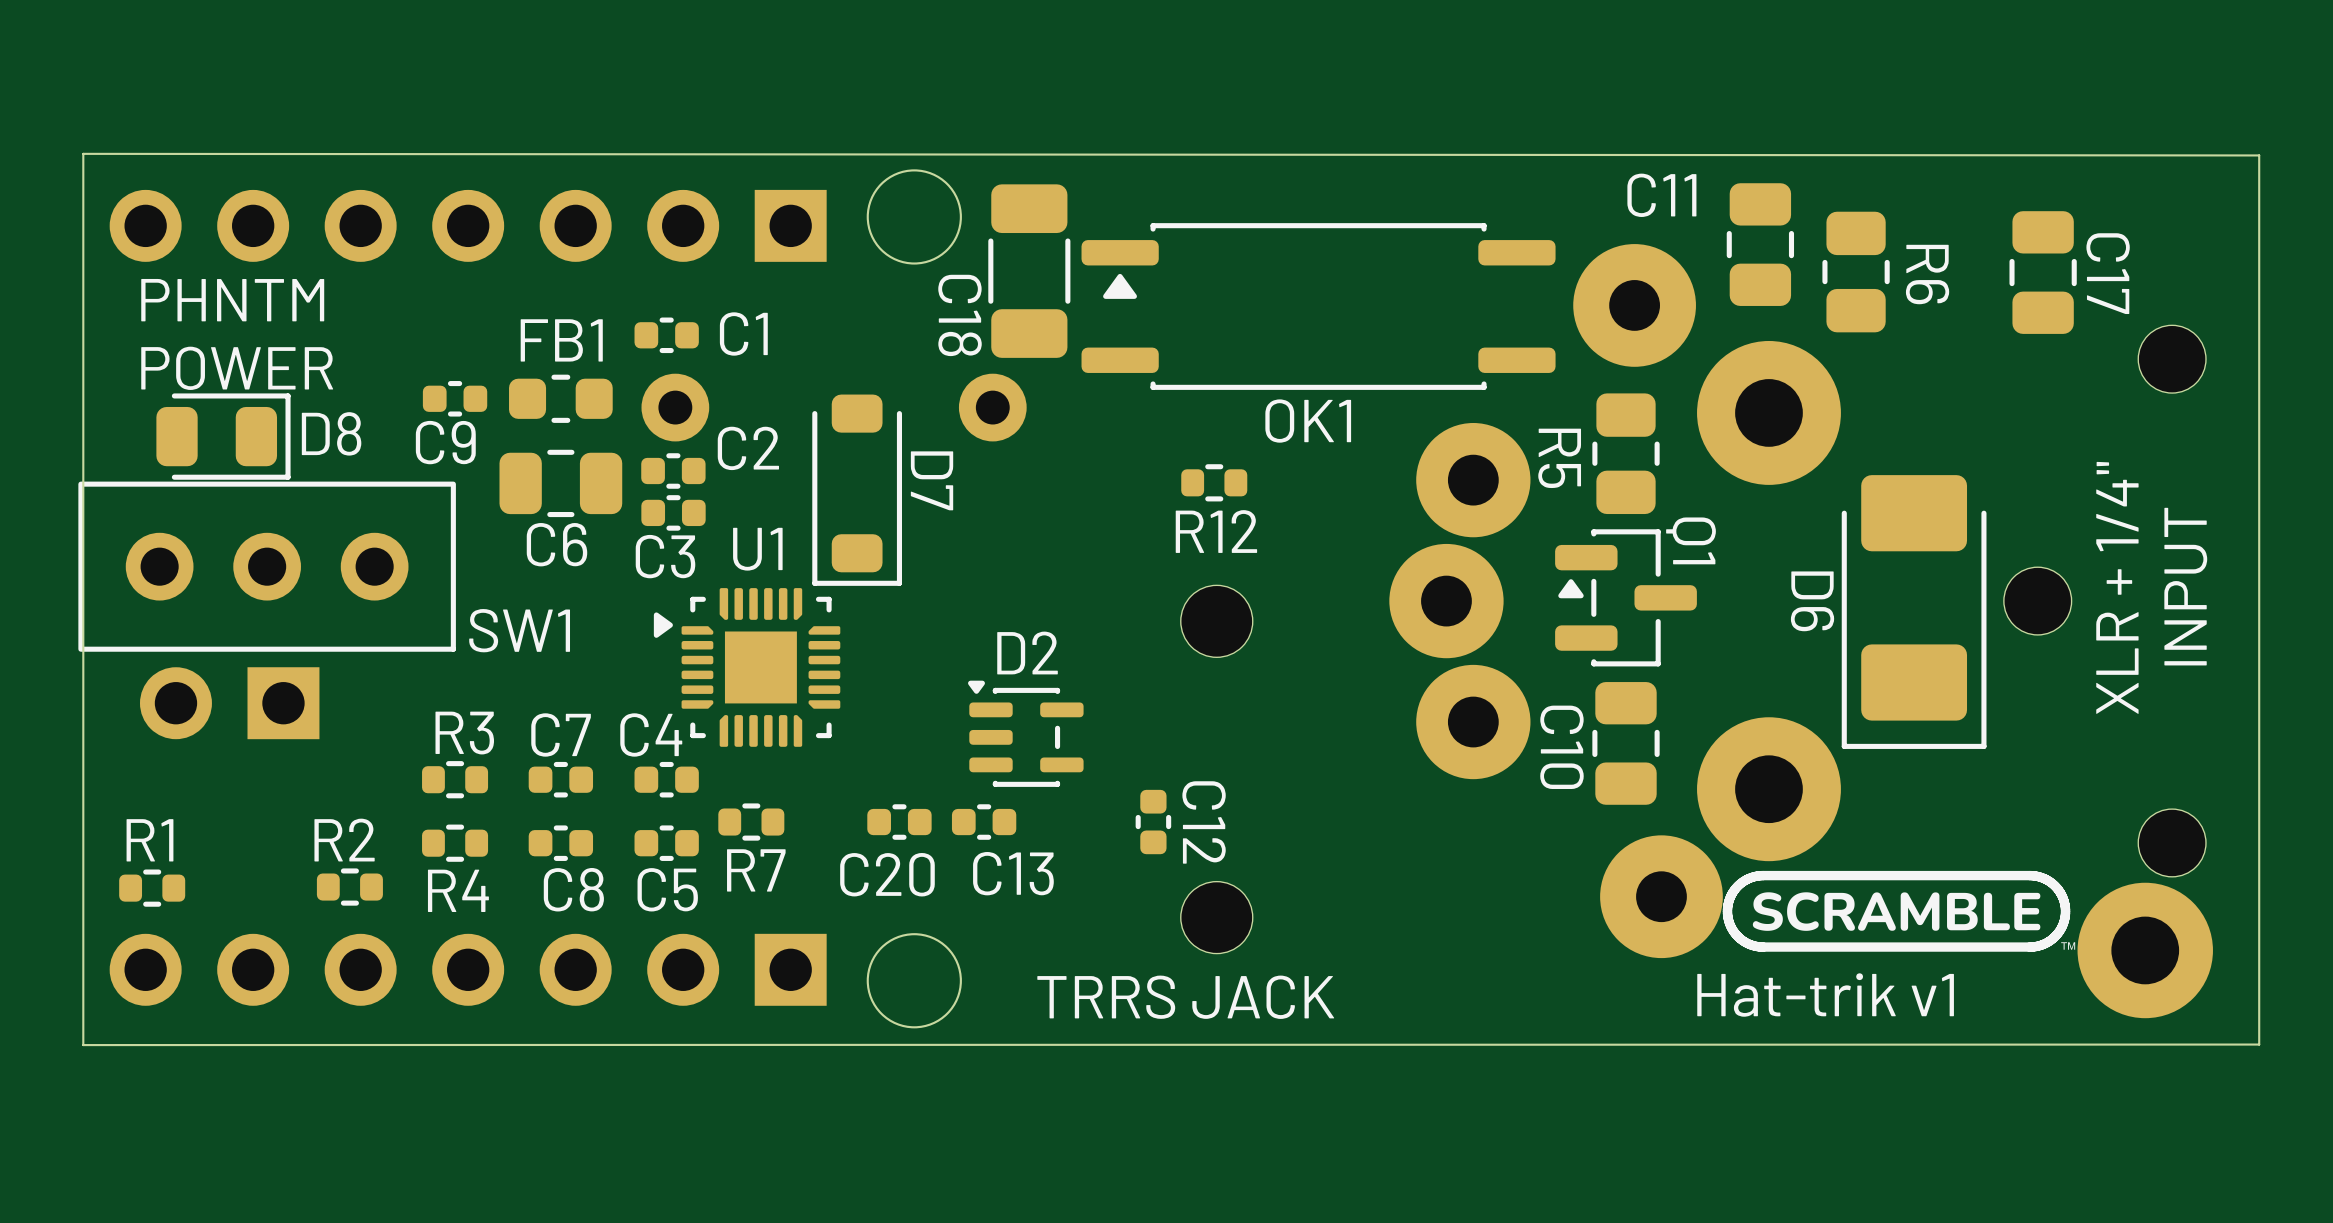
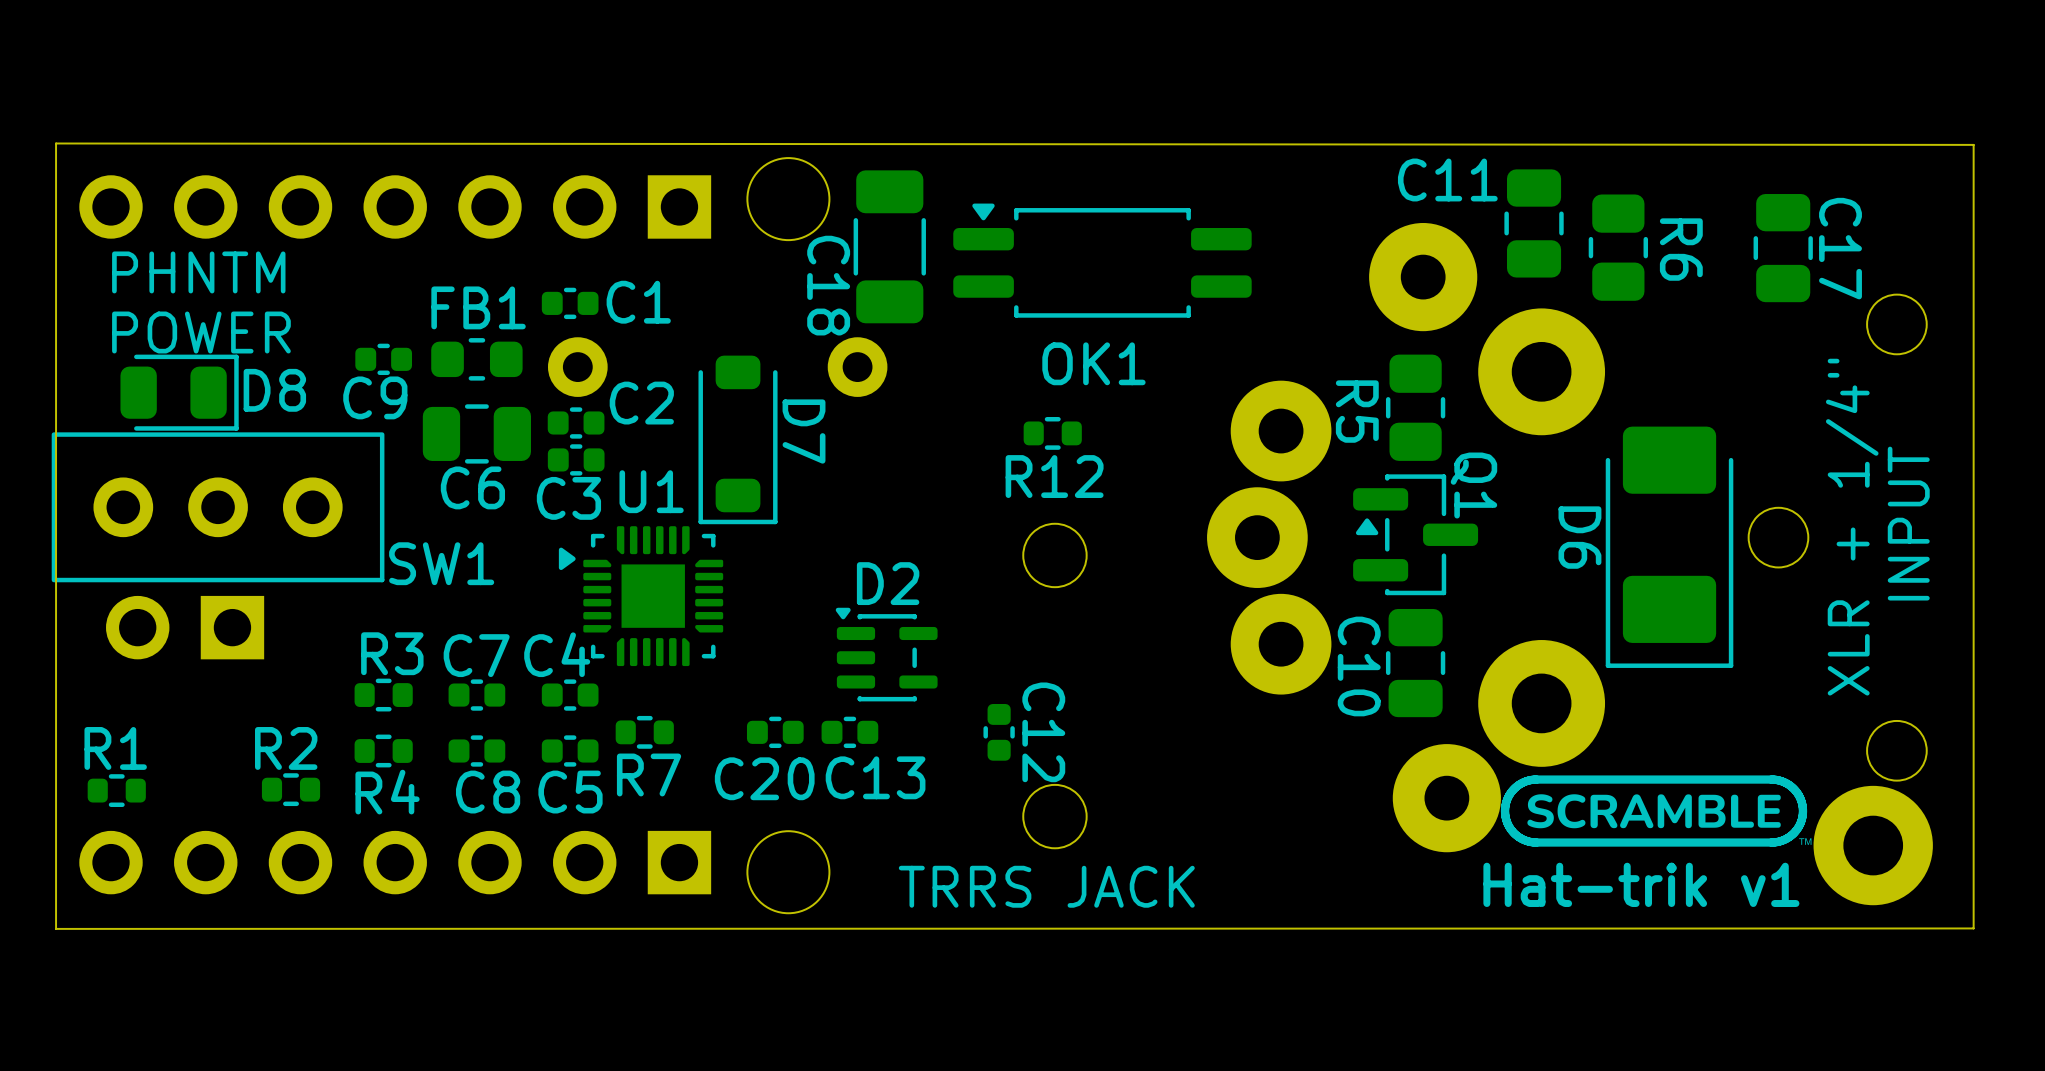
OK1 footprint: [1081, 223, 1556, 390] -> [953, 203, 1252, 318]

